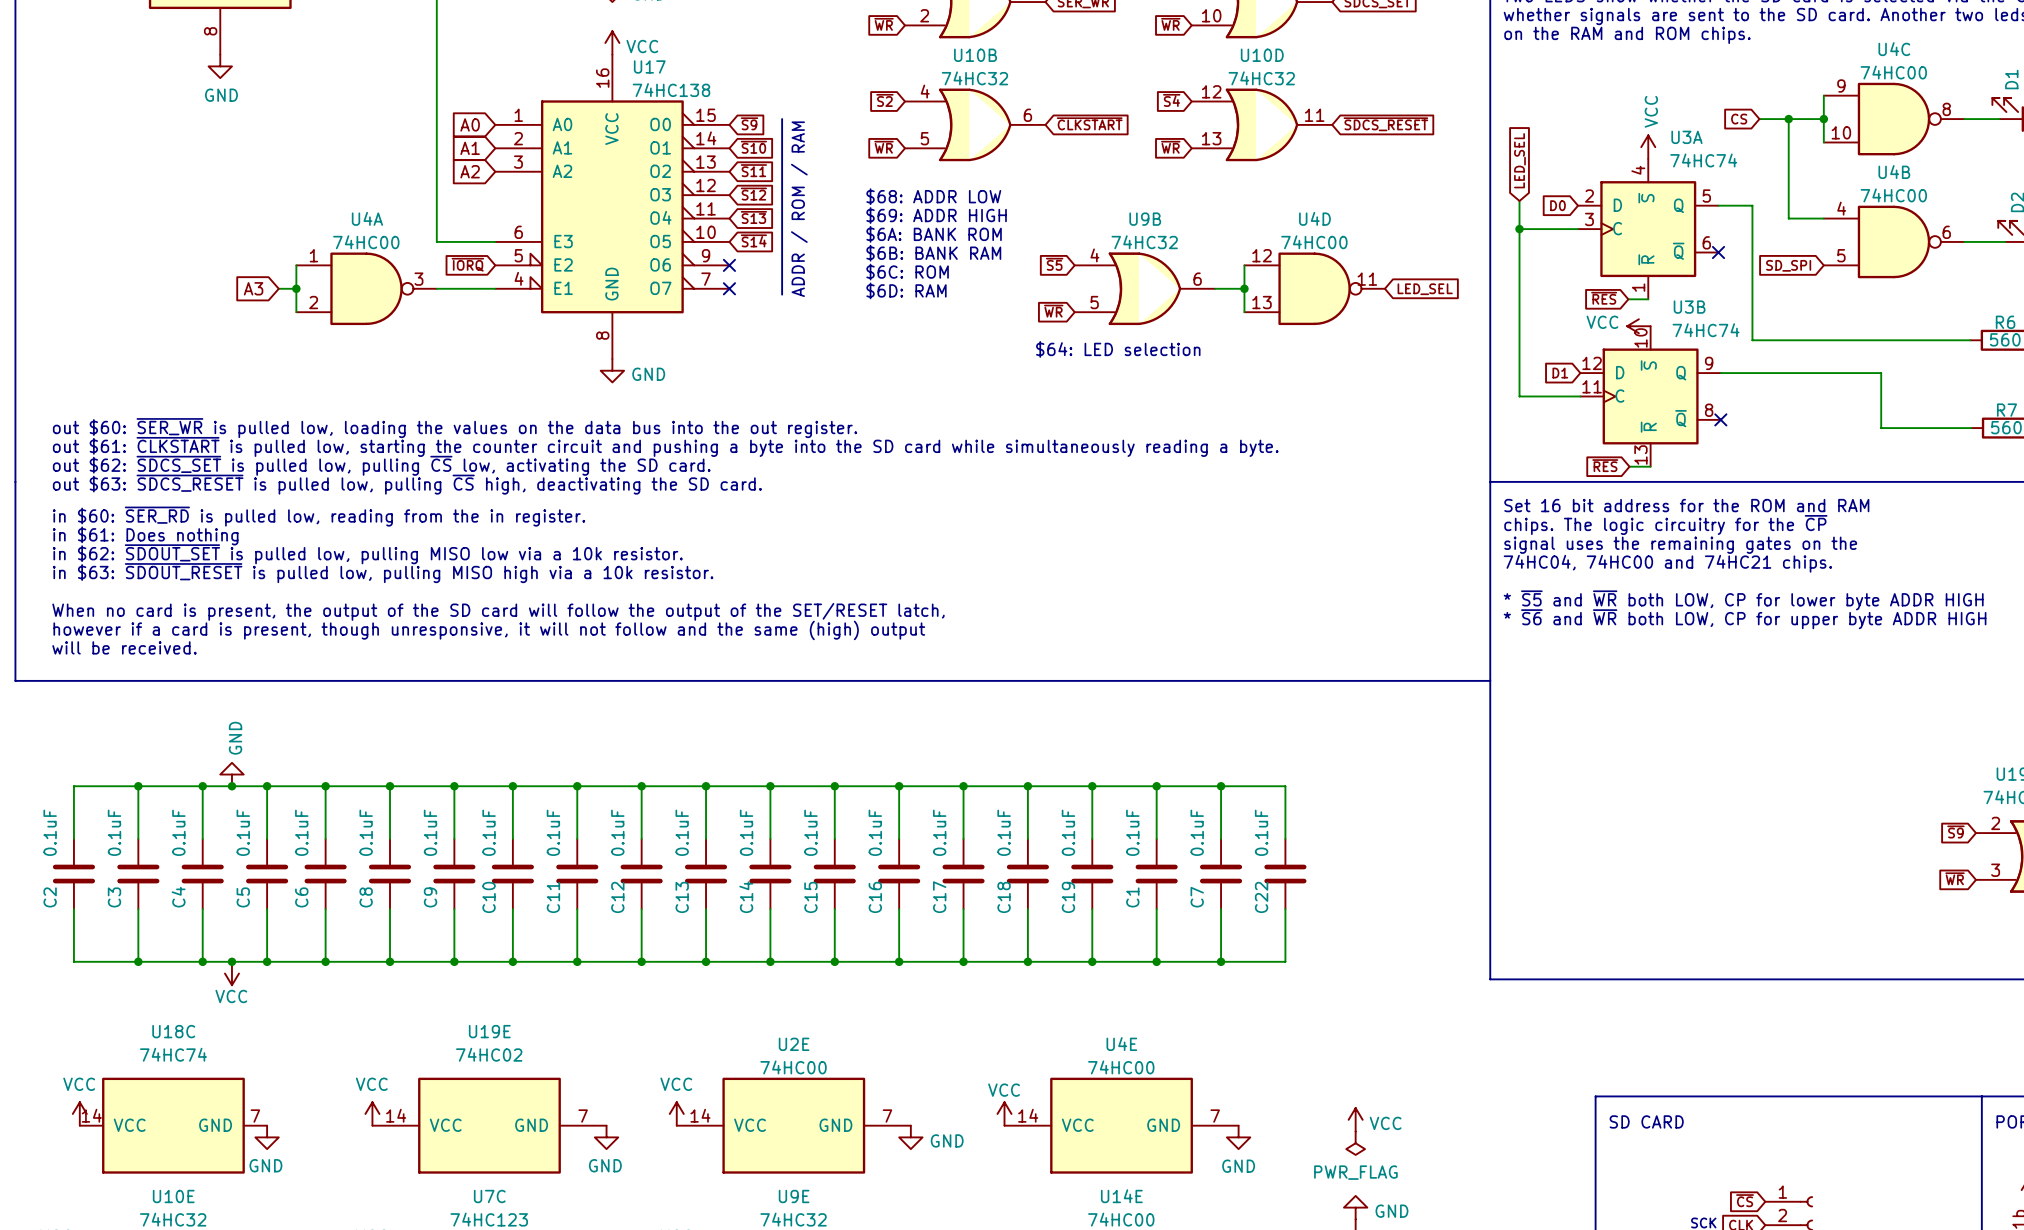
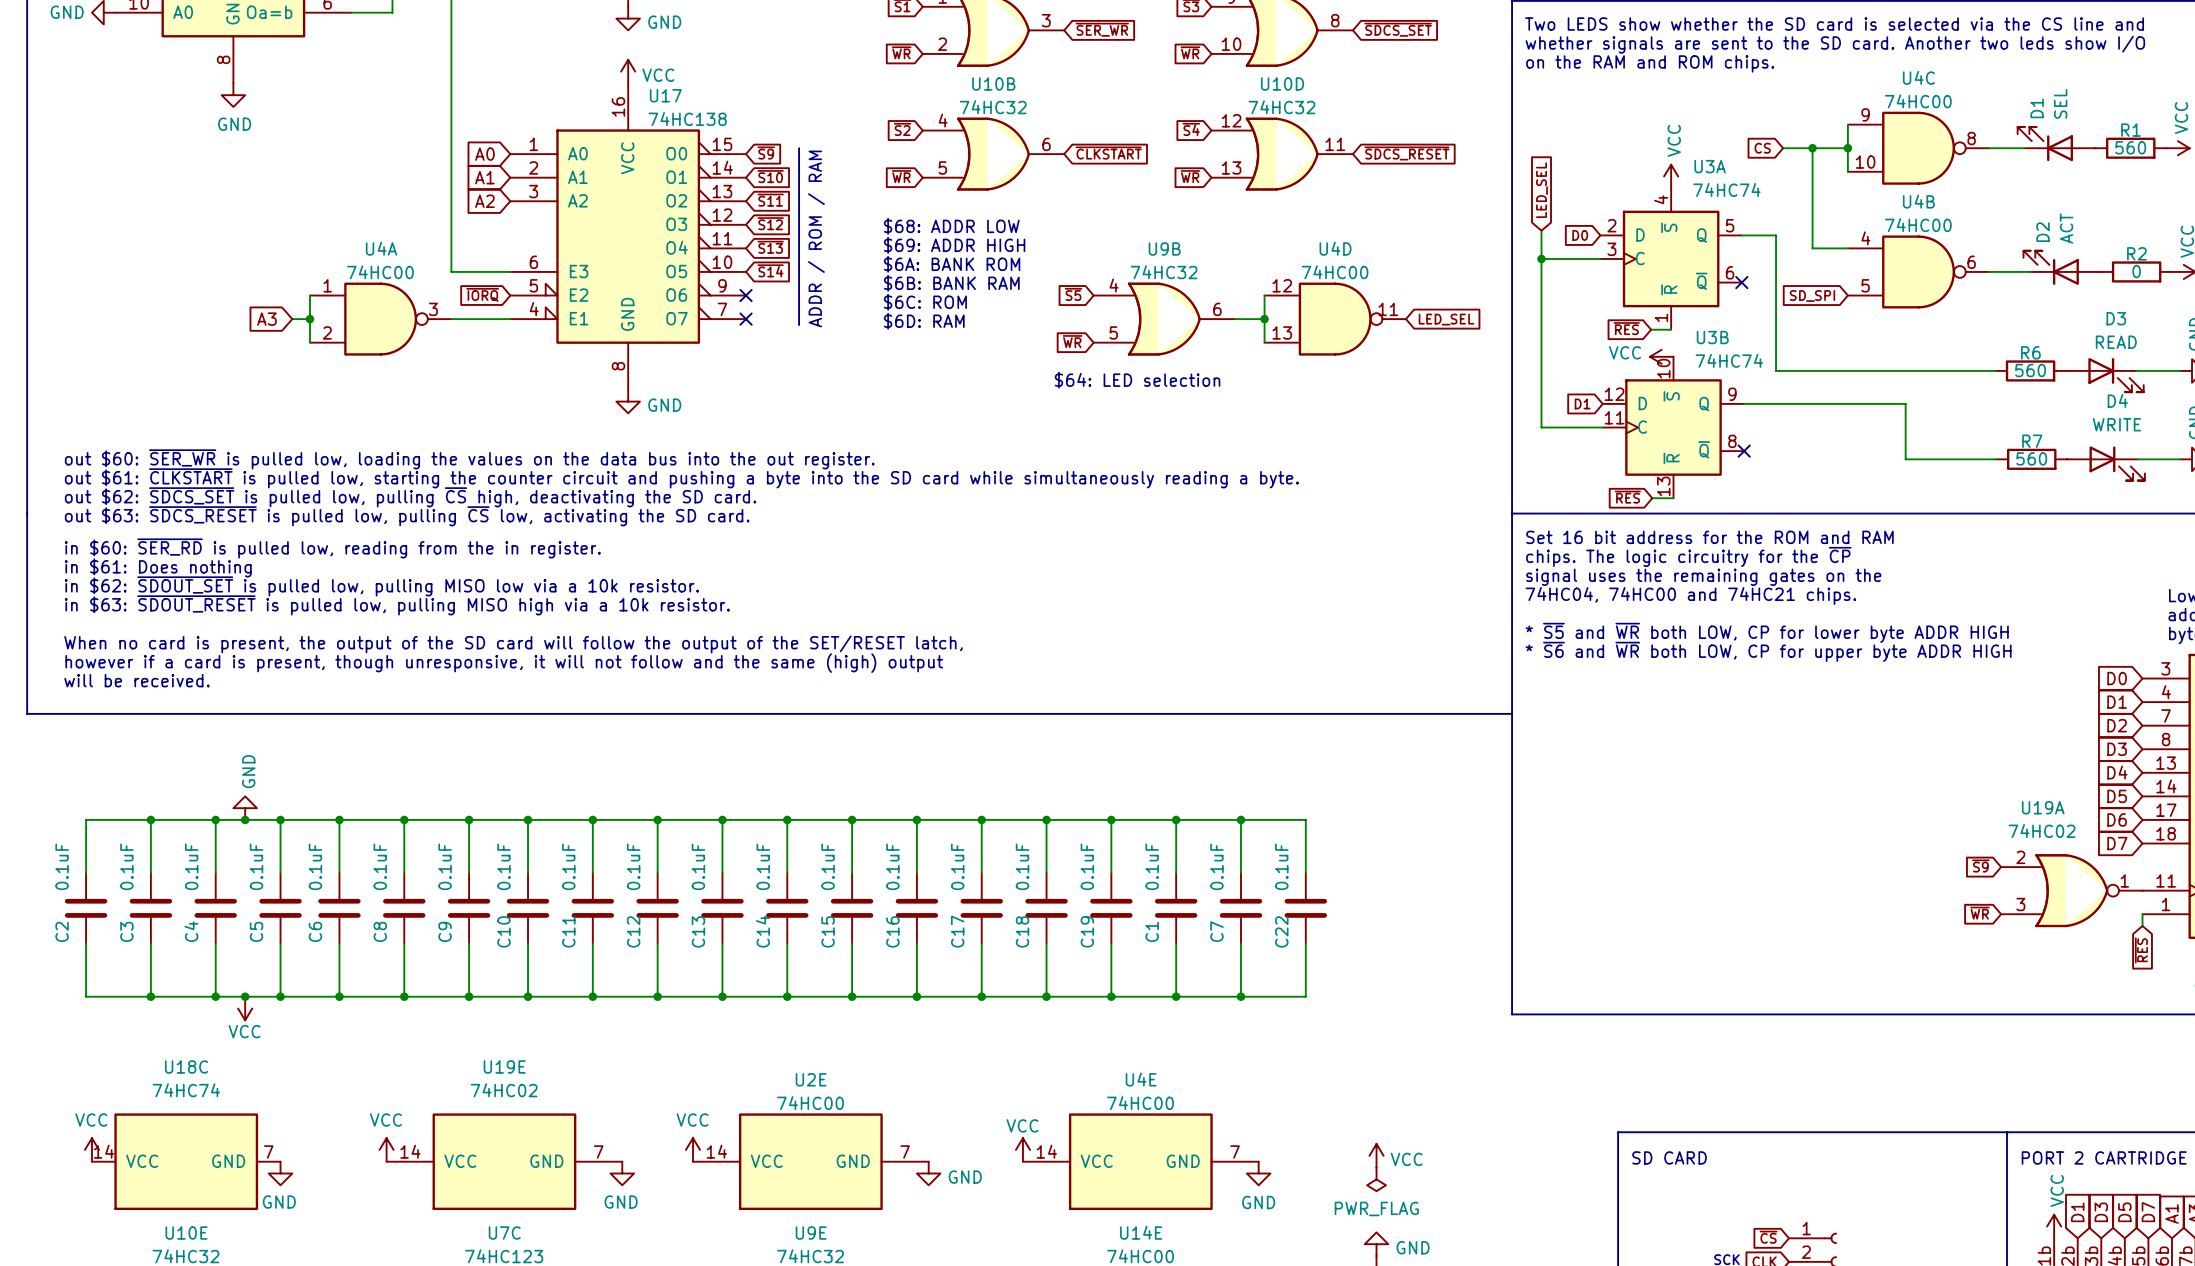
text: out $62: ~{SDCS_SET} is pulled low, pulling ~{CS} low, activating the SD card. (381, 465) -> out $62: ~{SDCS_SET} is pulled low, pulling ~{CS} high, deactivating the SD card. (410, 497)
text: out $63: ~{SDCS_RESET} is pulled low, pulling ~{CS} high, deactivating the SD card. (407, 484) -> out $63: ~{SDCS_RESET} is pulled low, pulling ~{CS} low, activating the SD card. (407, 516)

